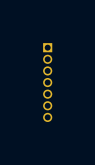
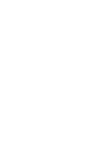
part: (47, 82) -> none

